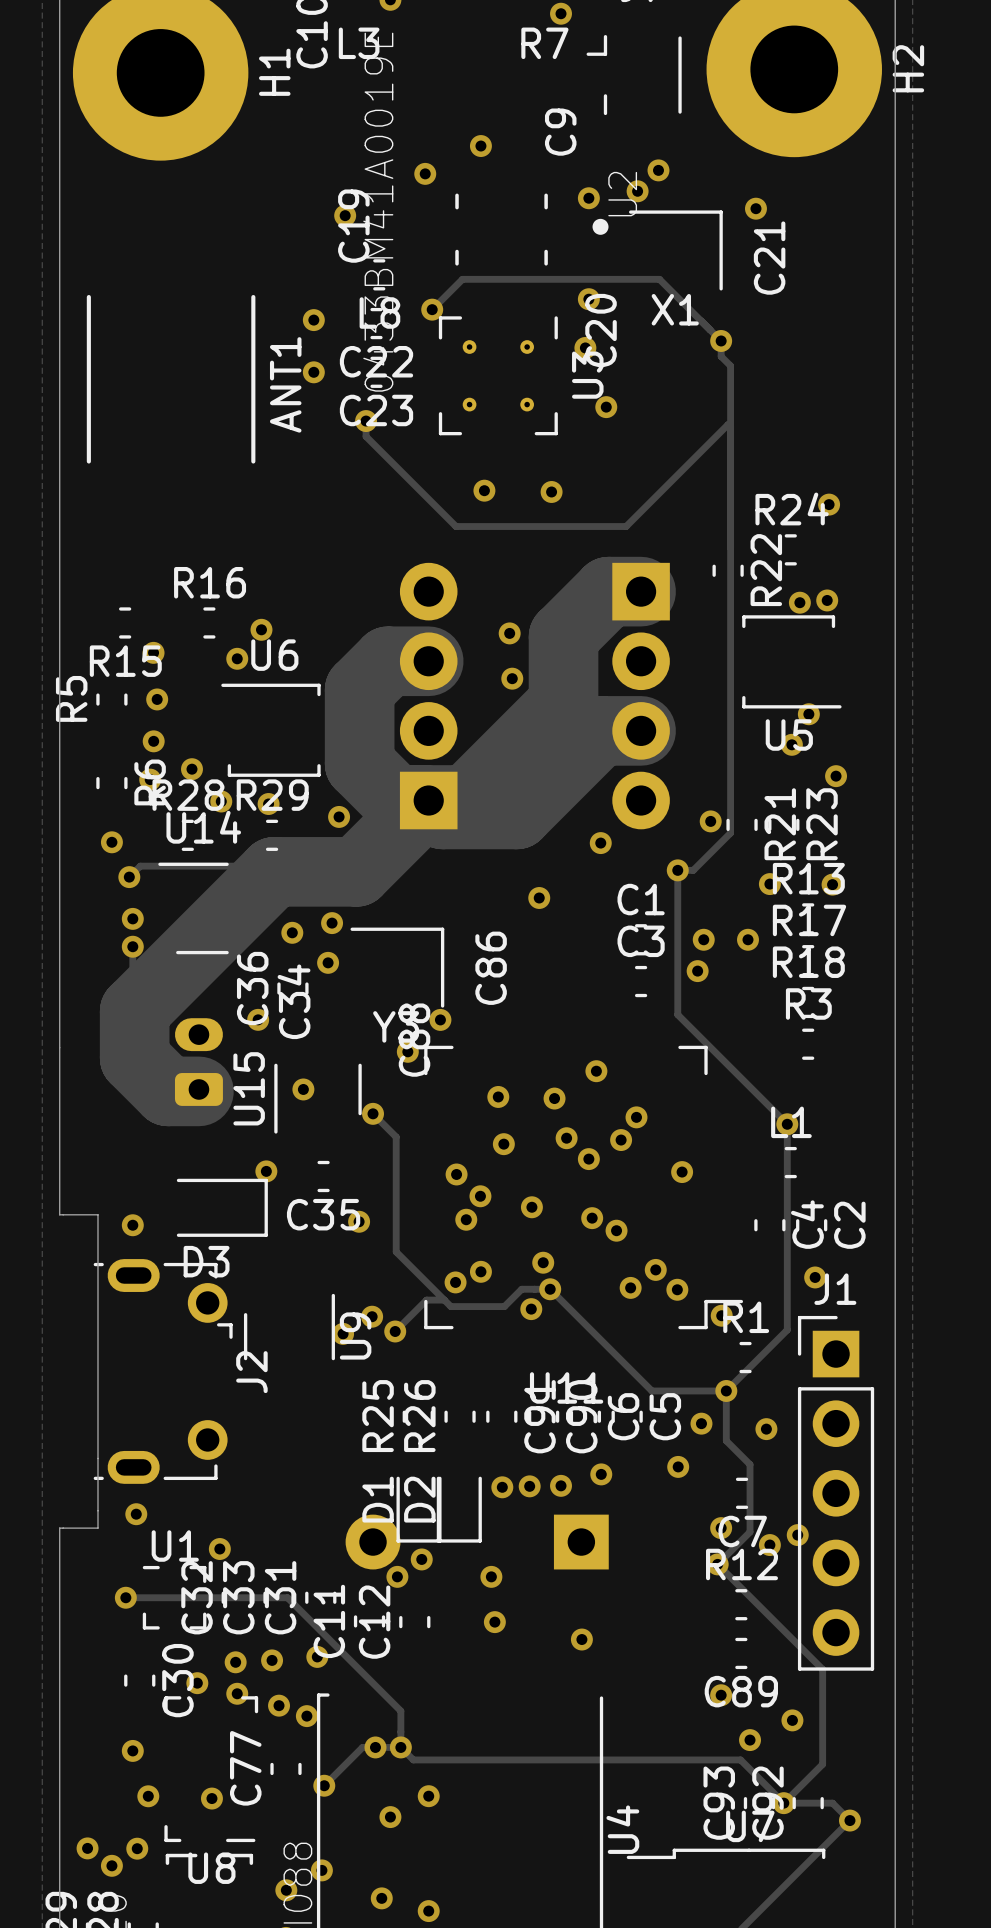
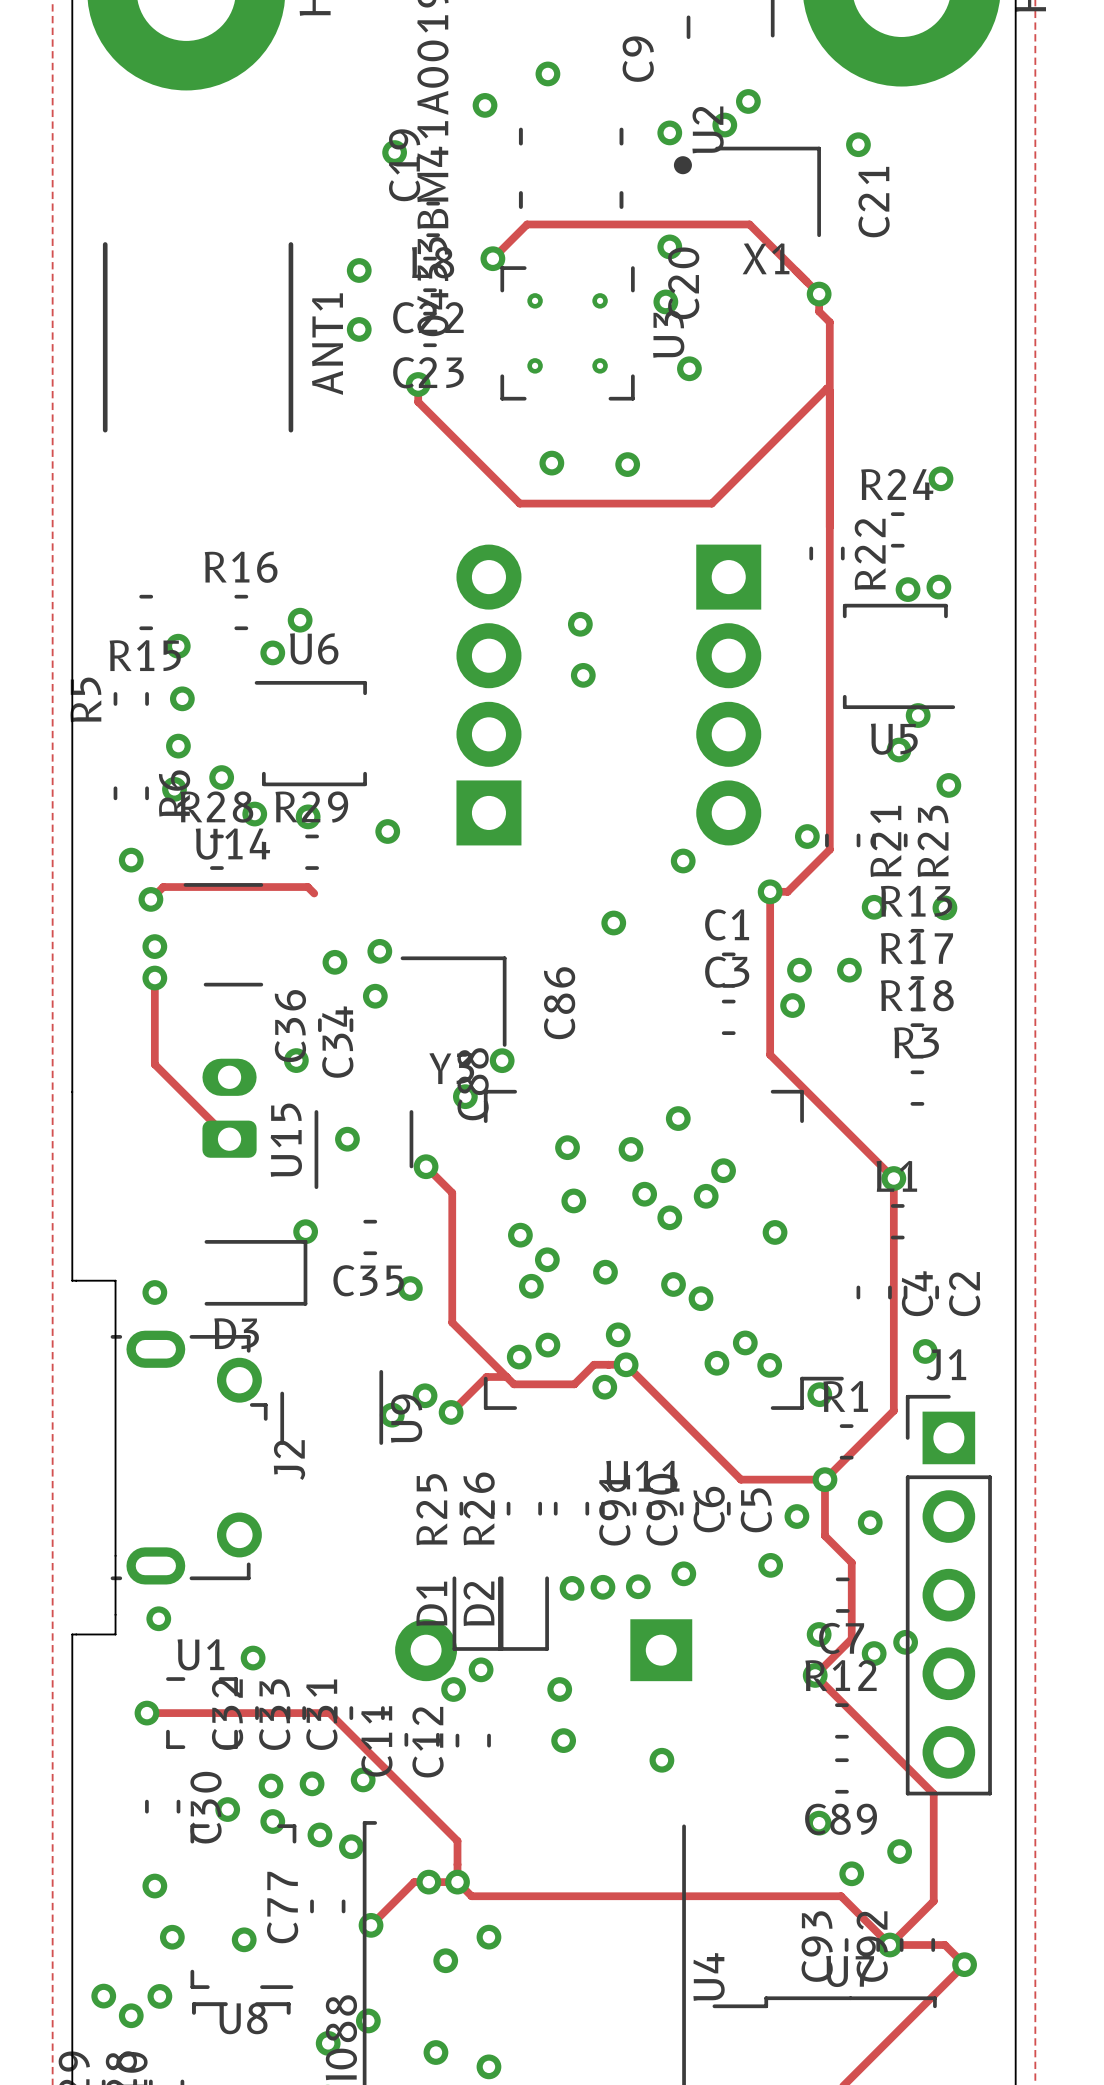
track: (641, 591) (608, 591) (563, 636) (563, 703) (466, 799) (395, 799) -> none
track: (428, 661) (388, 661) (359, 689) (359, 764) (396, 800) (427, 800) (356, 871) (273, 871) (134, 1011) (134, 1058) (167, 1091) (198, 1091) -> none
track: (641, 730) (600, 730) (516, 814) (442, 814) (428, 800) -> none

